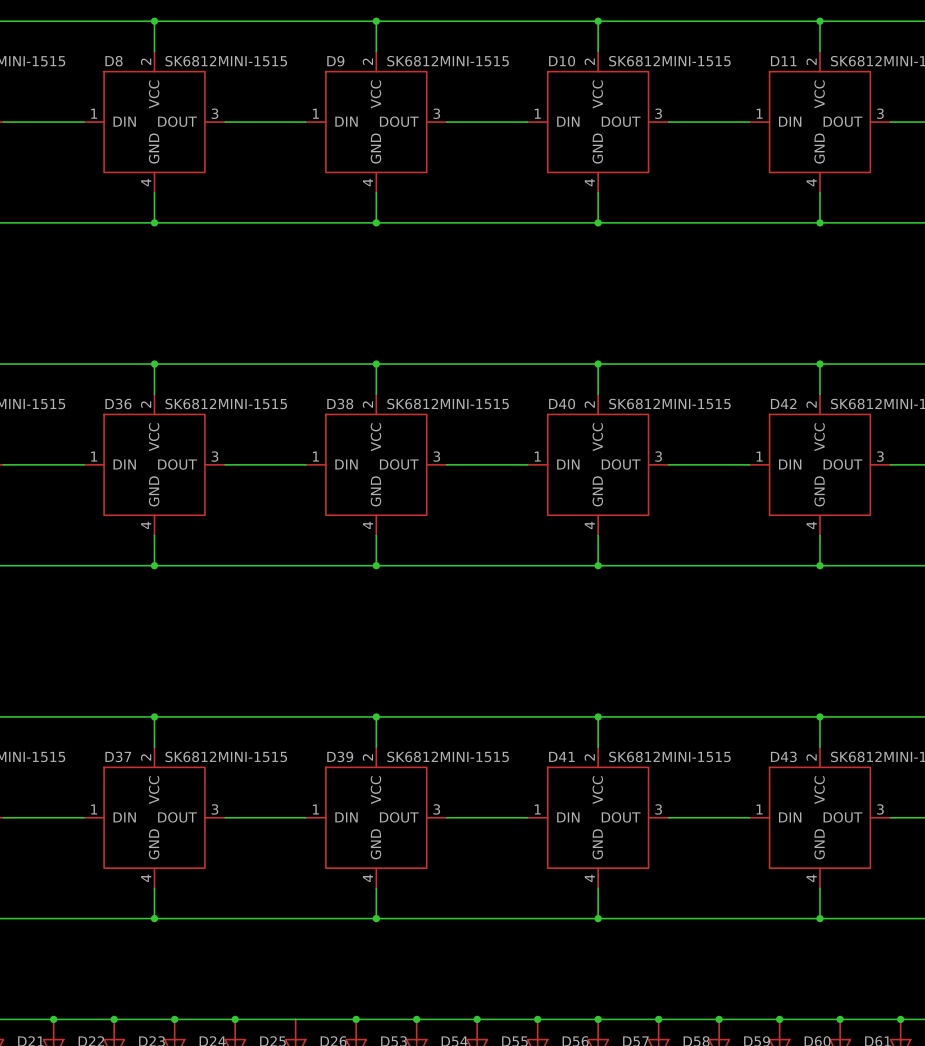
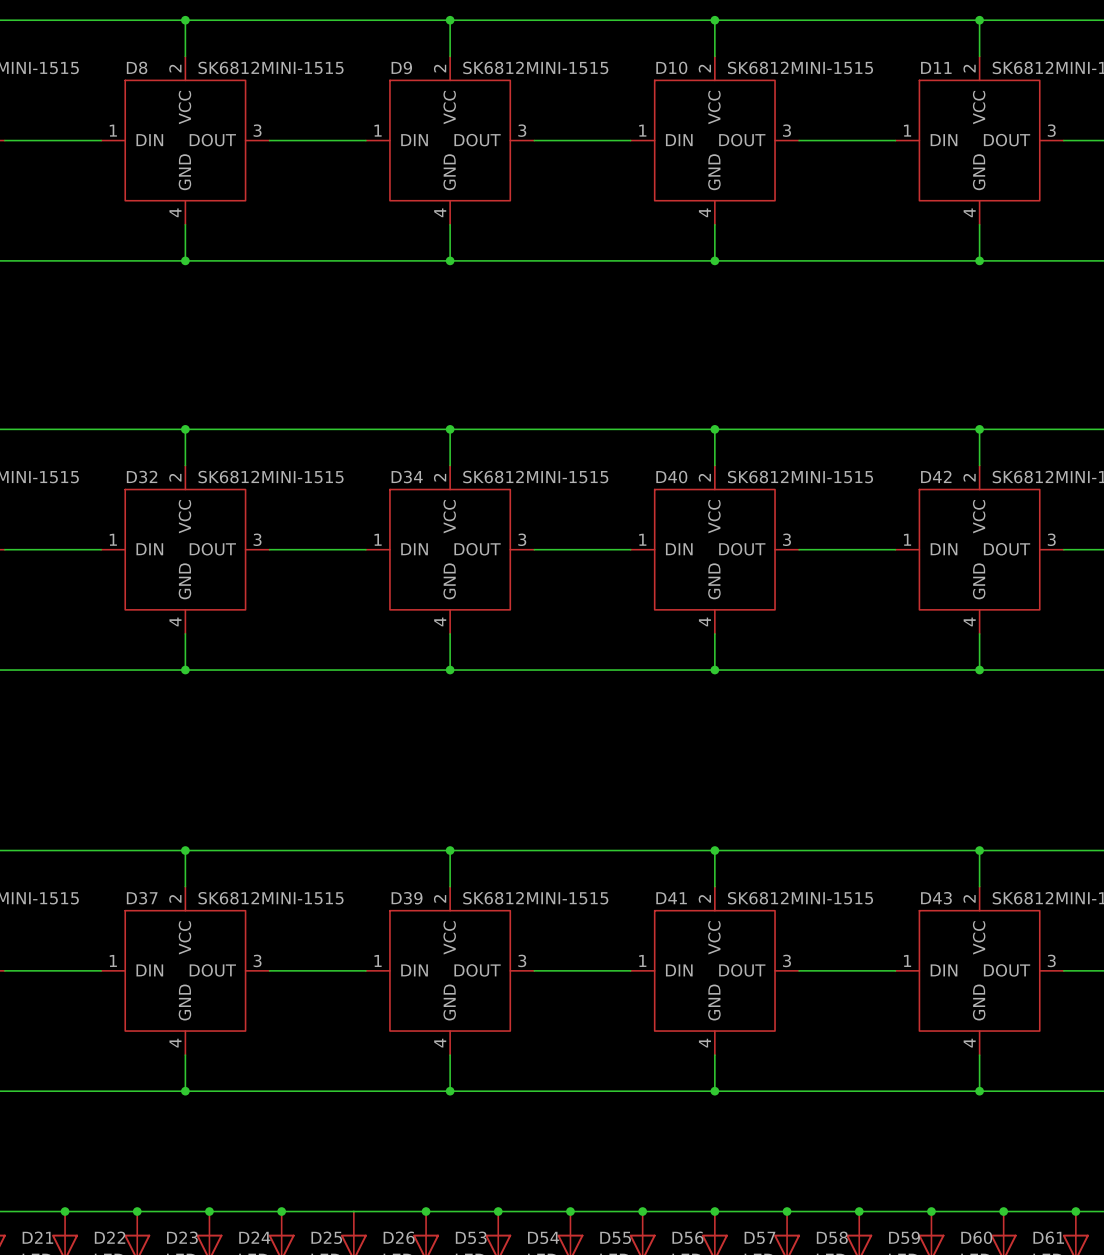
D36 name: D36 (118, 404) -> D32 (142, 477)
D38 name: D38 (340, 404) -> D34 (407, 477)

